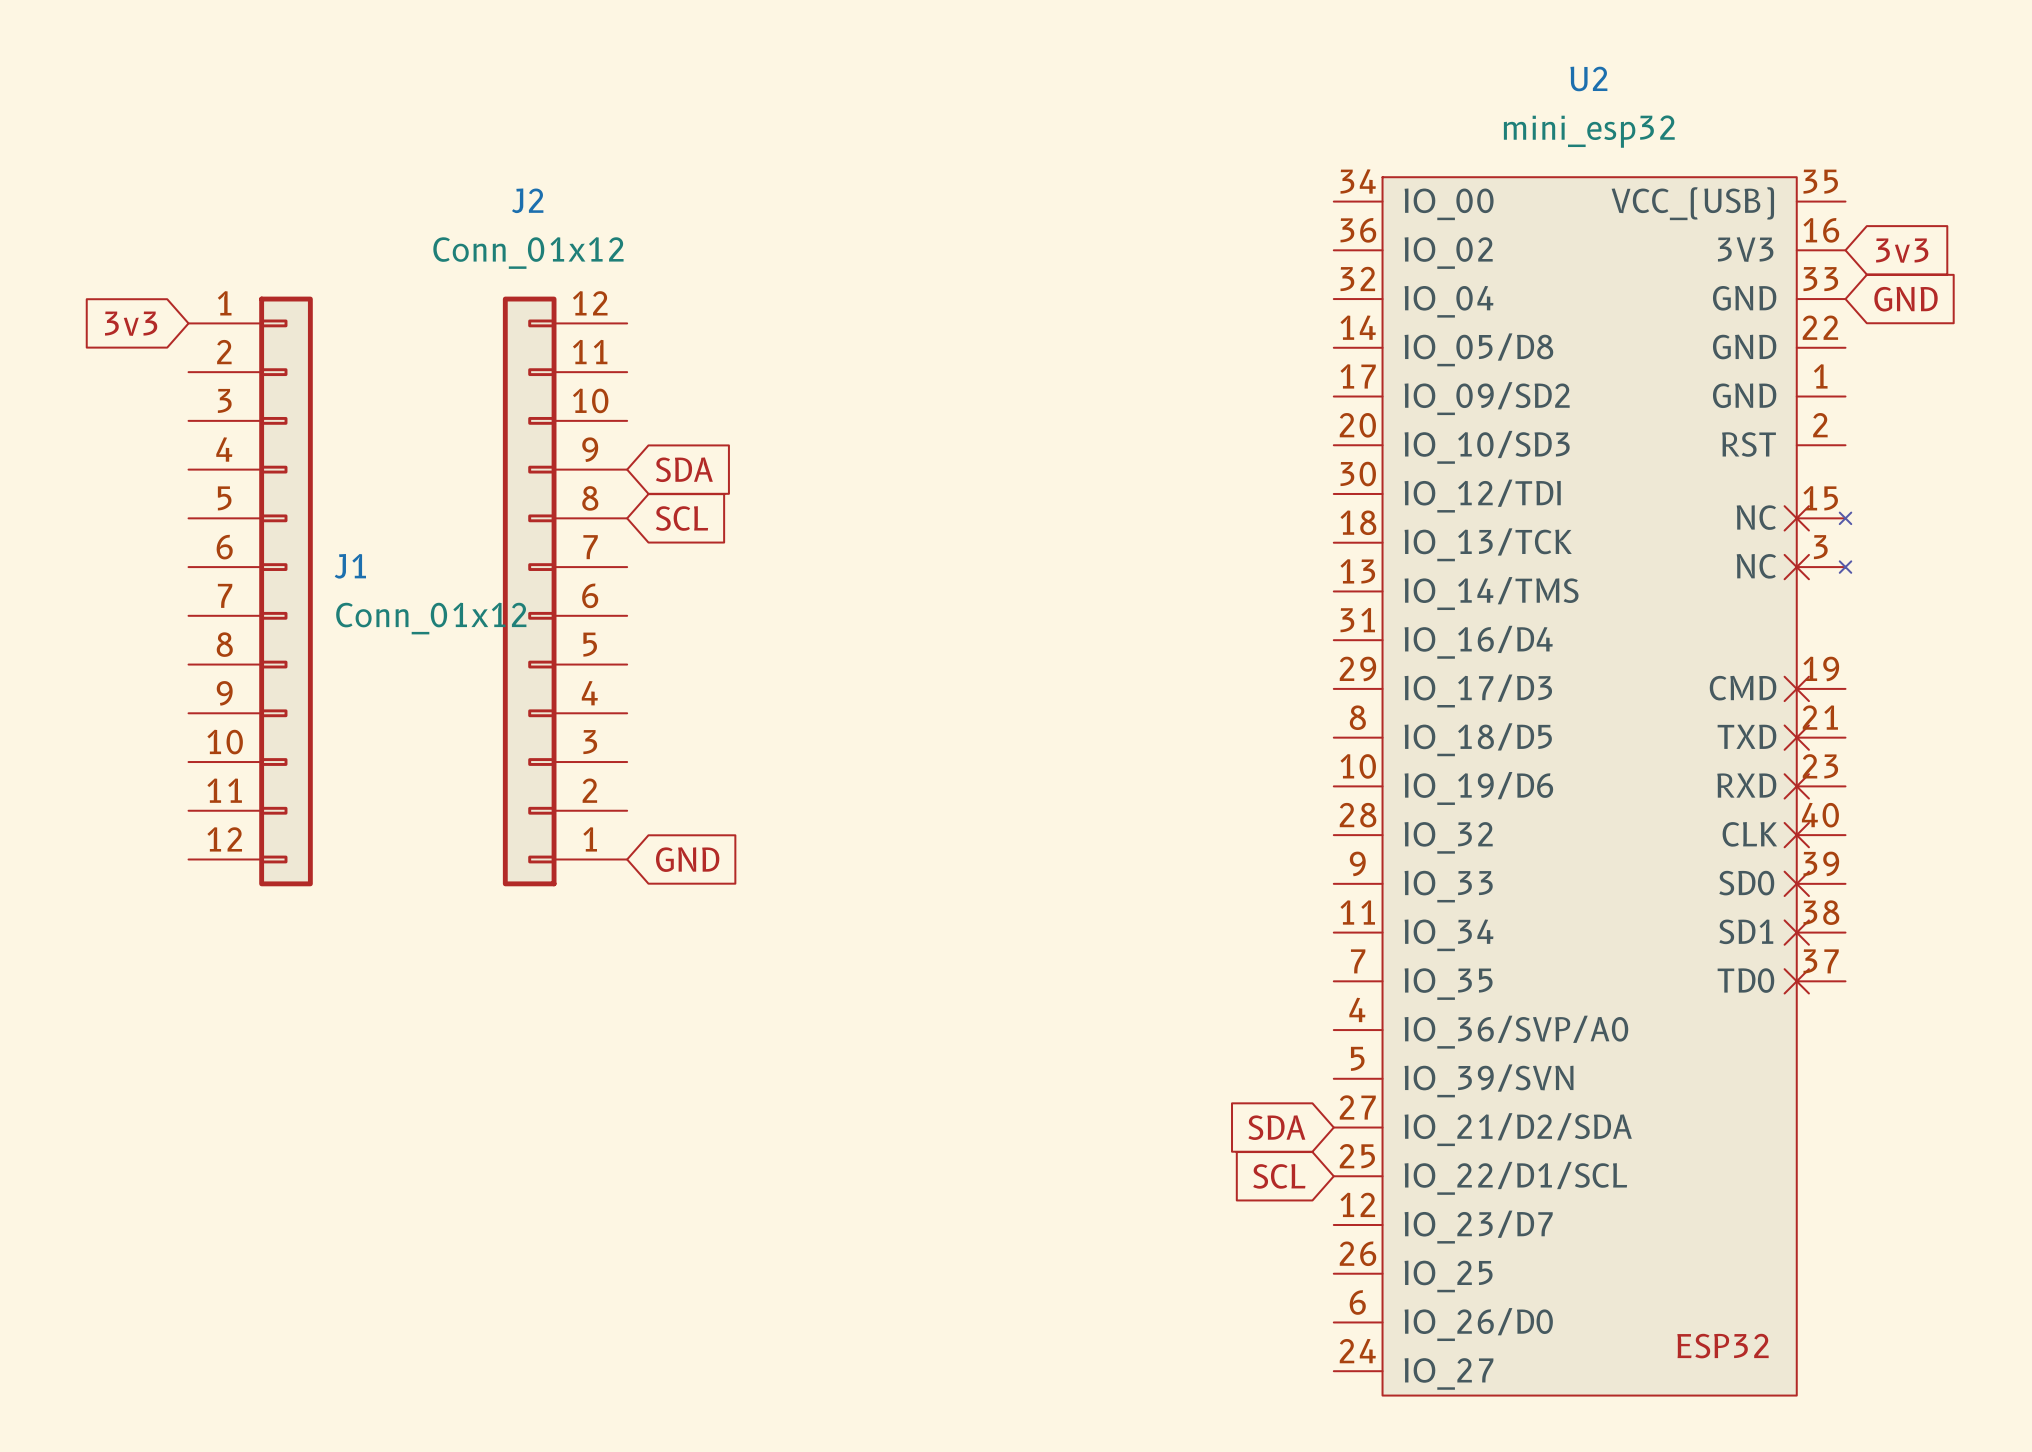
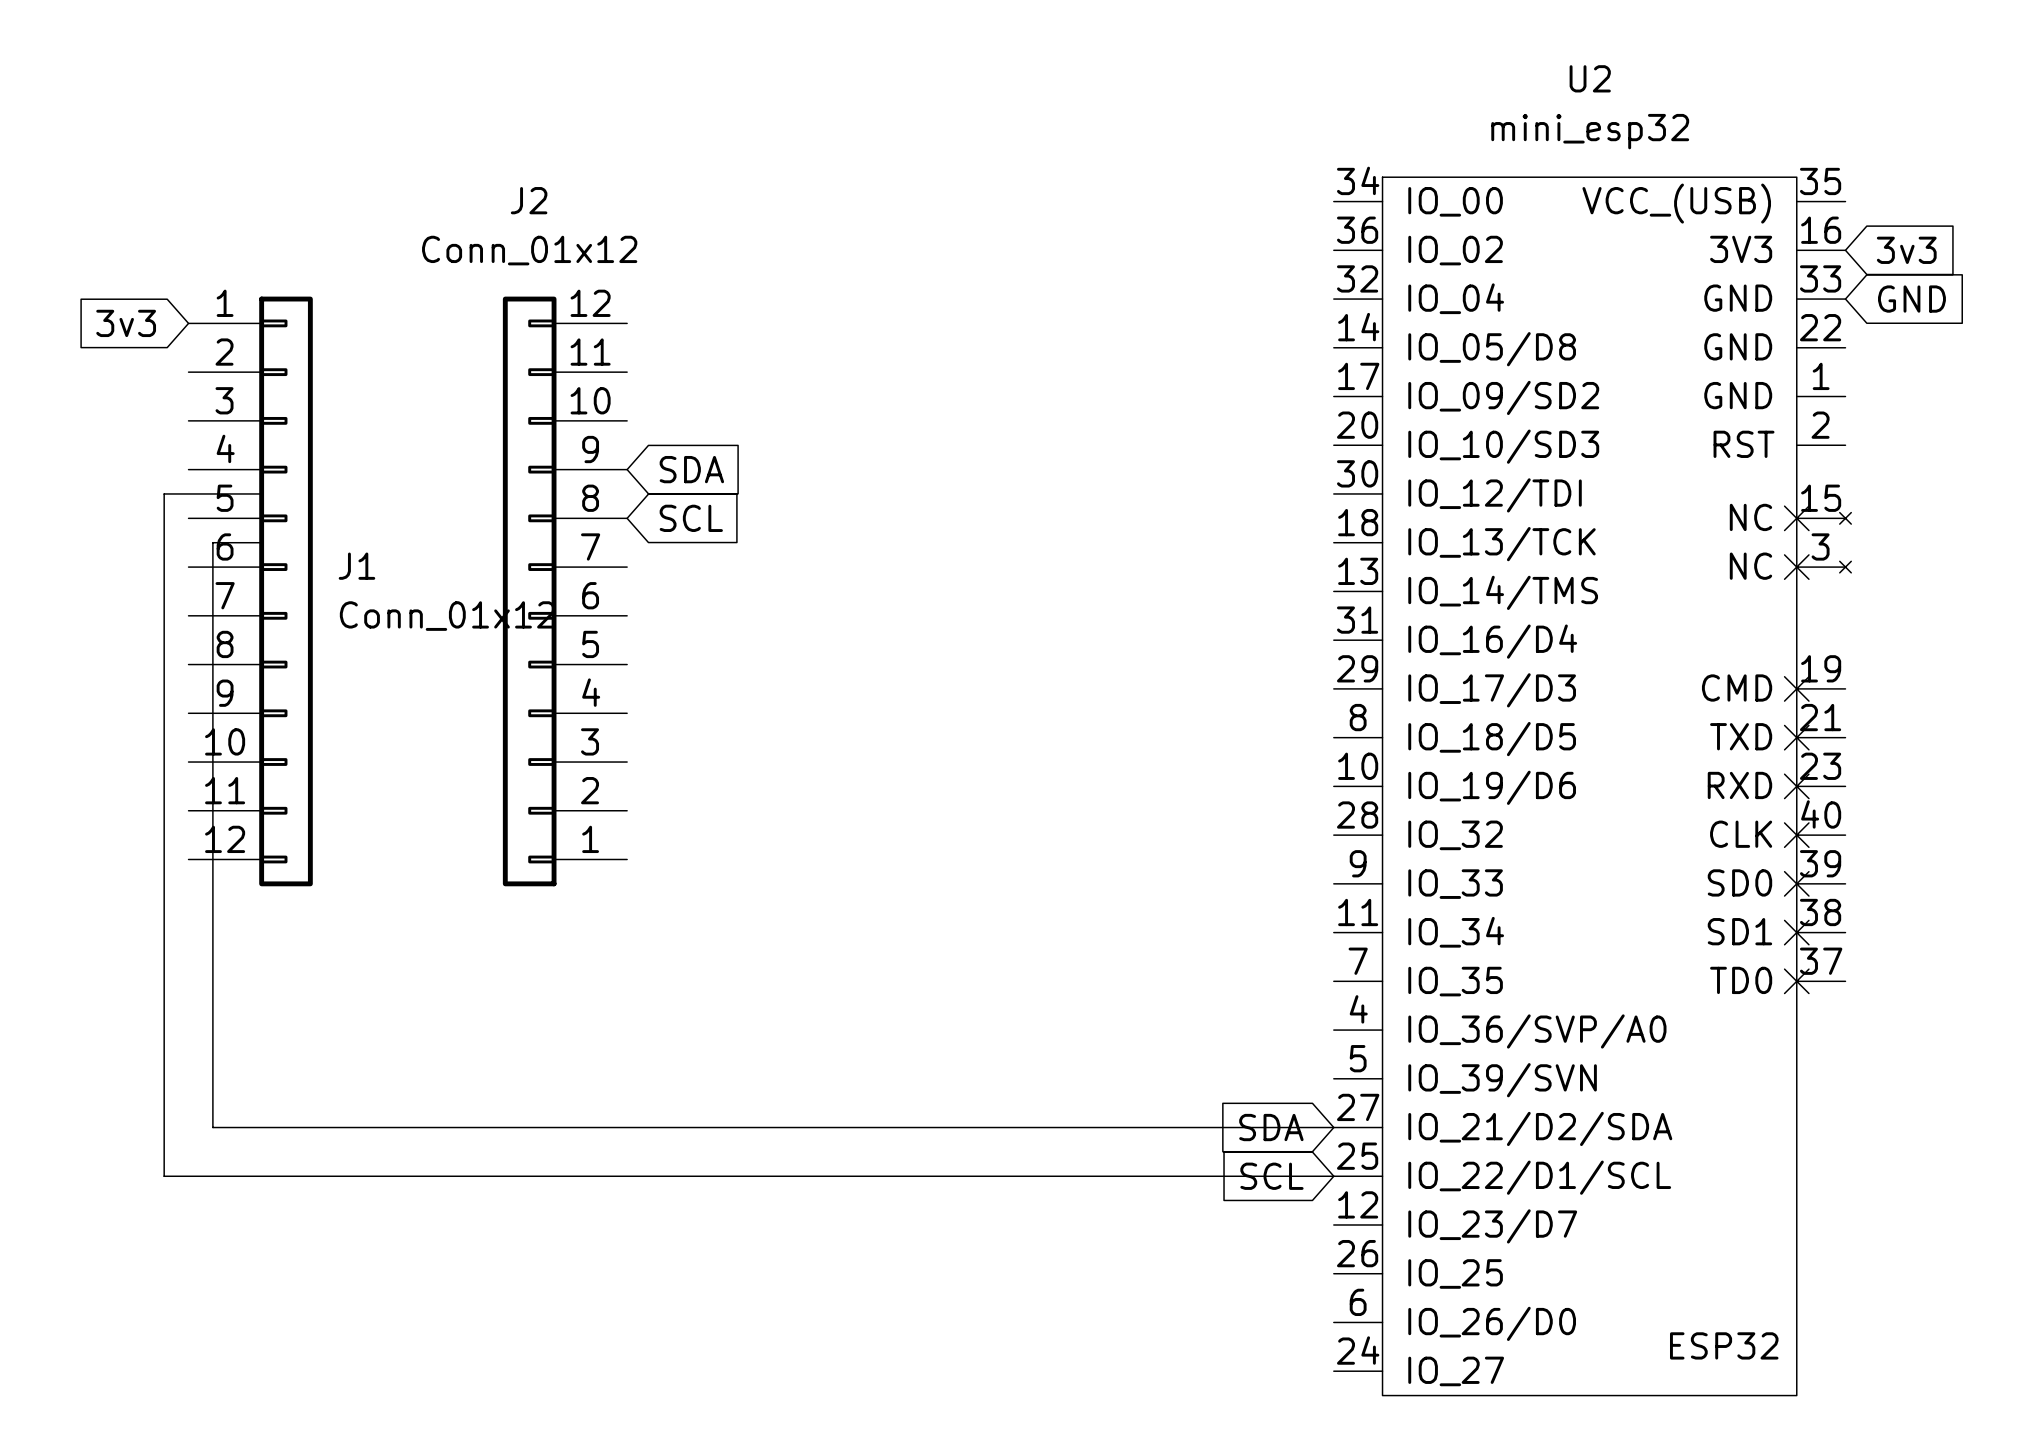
wire: none -> (261, 493) (164, 493) (164, 1176) (1333, 1176)
wire: none -> (261, 542) (212, 542) (212, 1127) (1333, 1127)
global label: GND (687, 859) -> none

